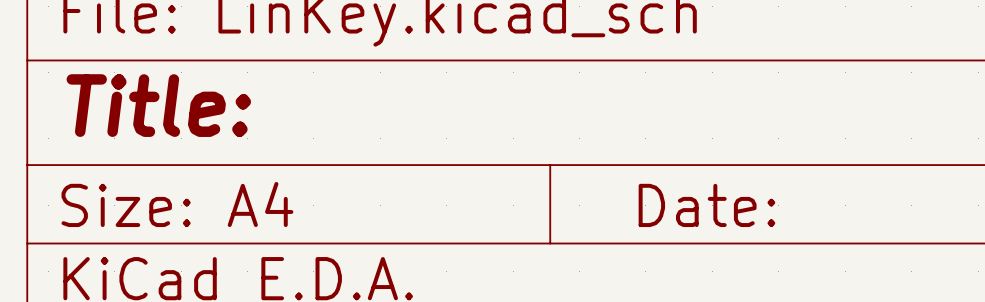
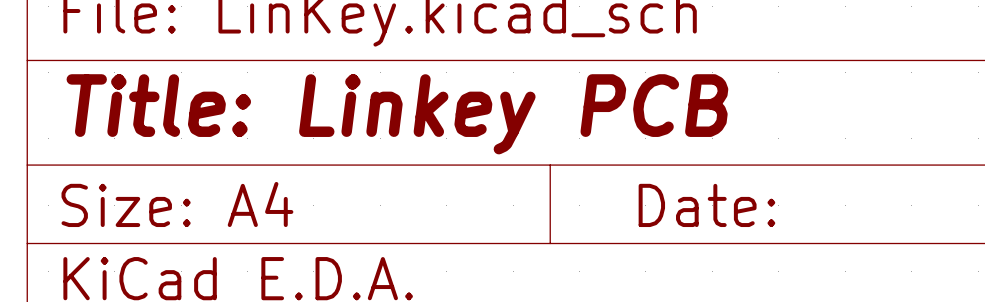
title block: Title: (158, 105) -> Title: Linkey PCB (397, 114)

